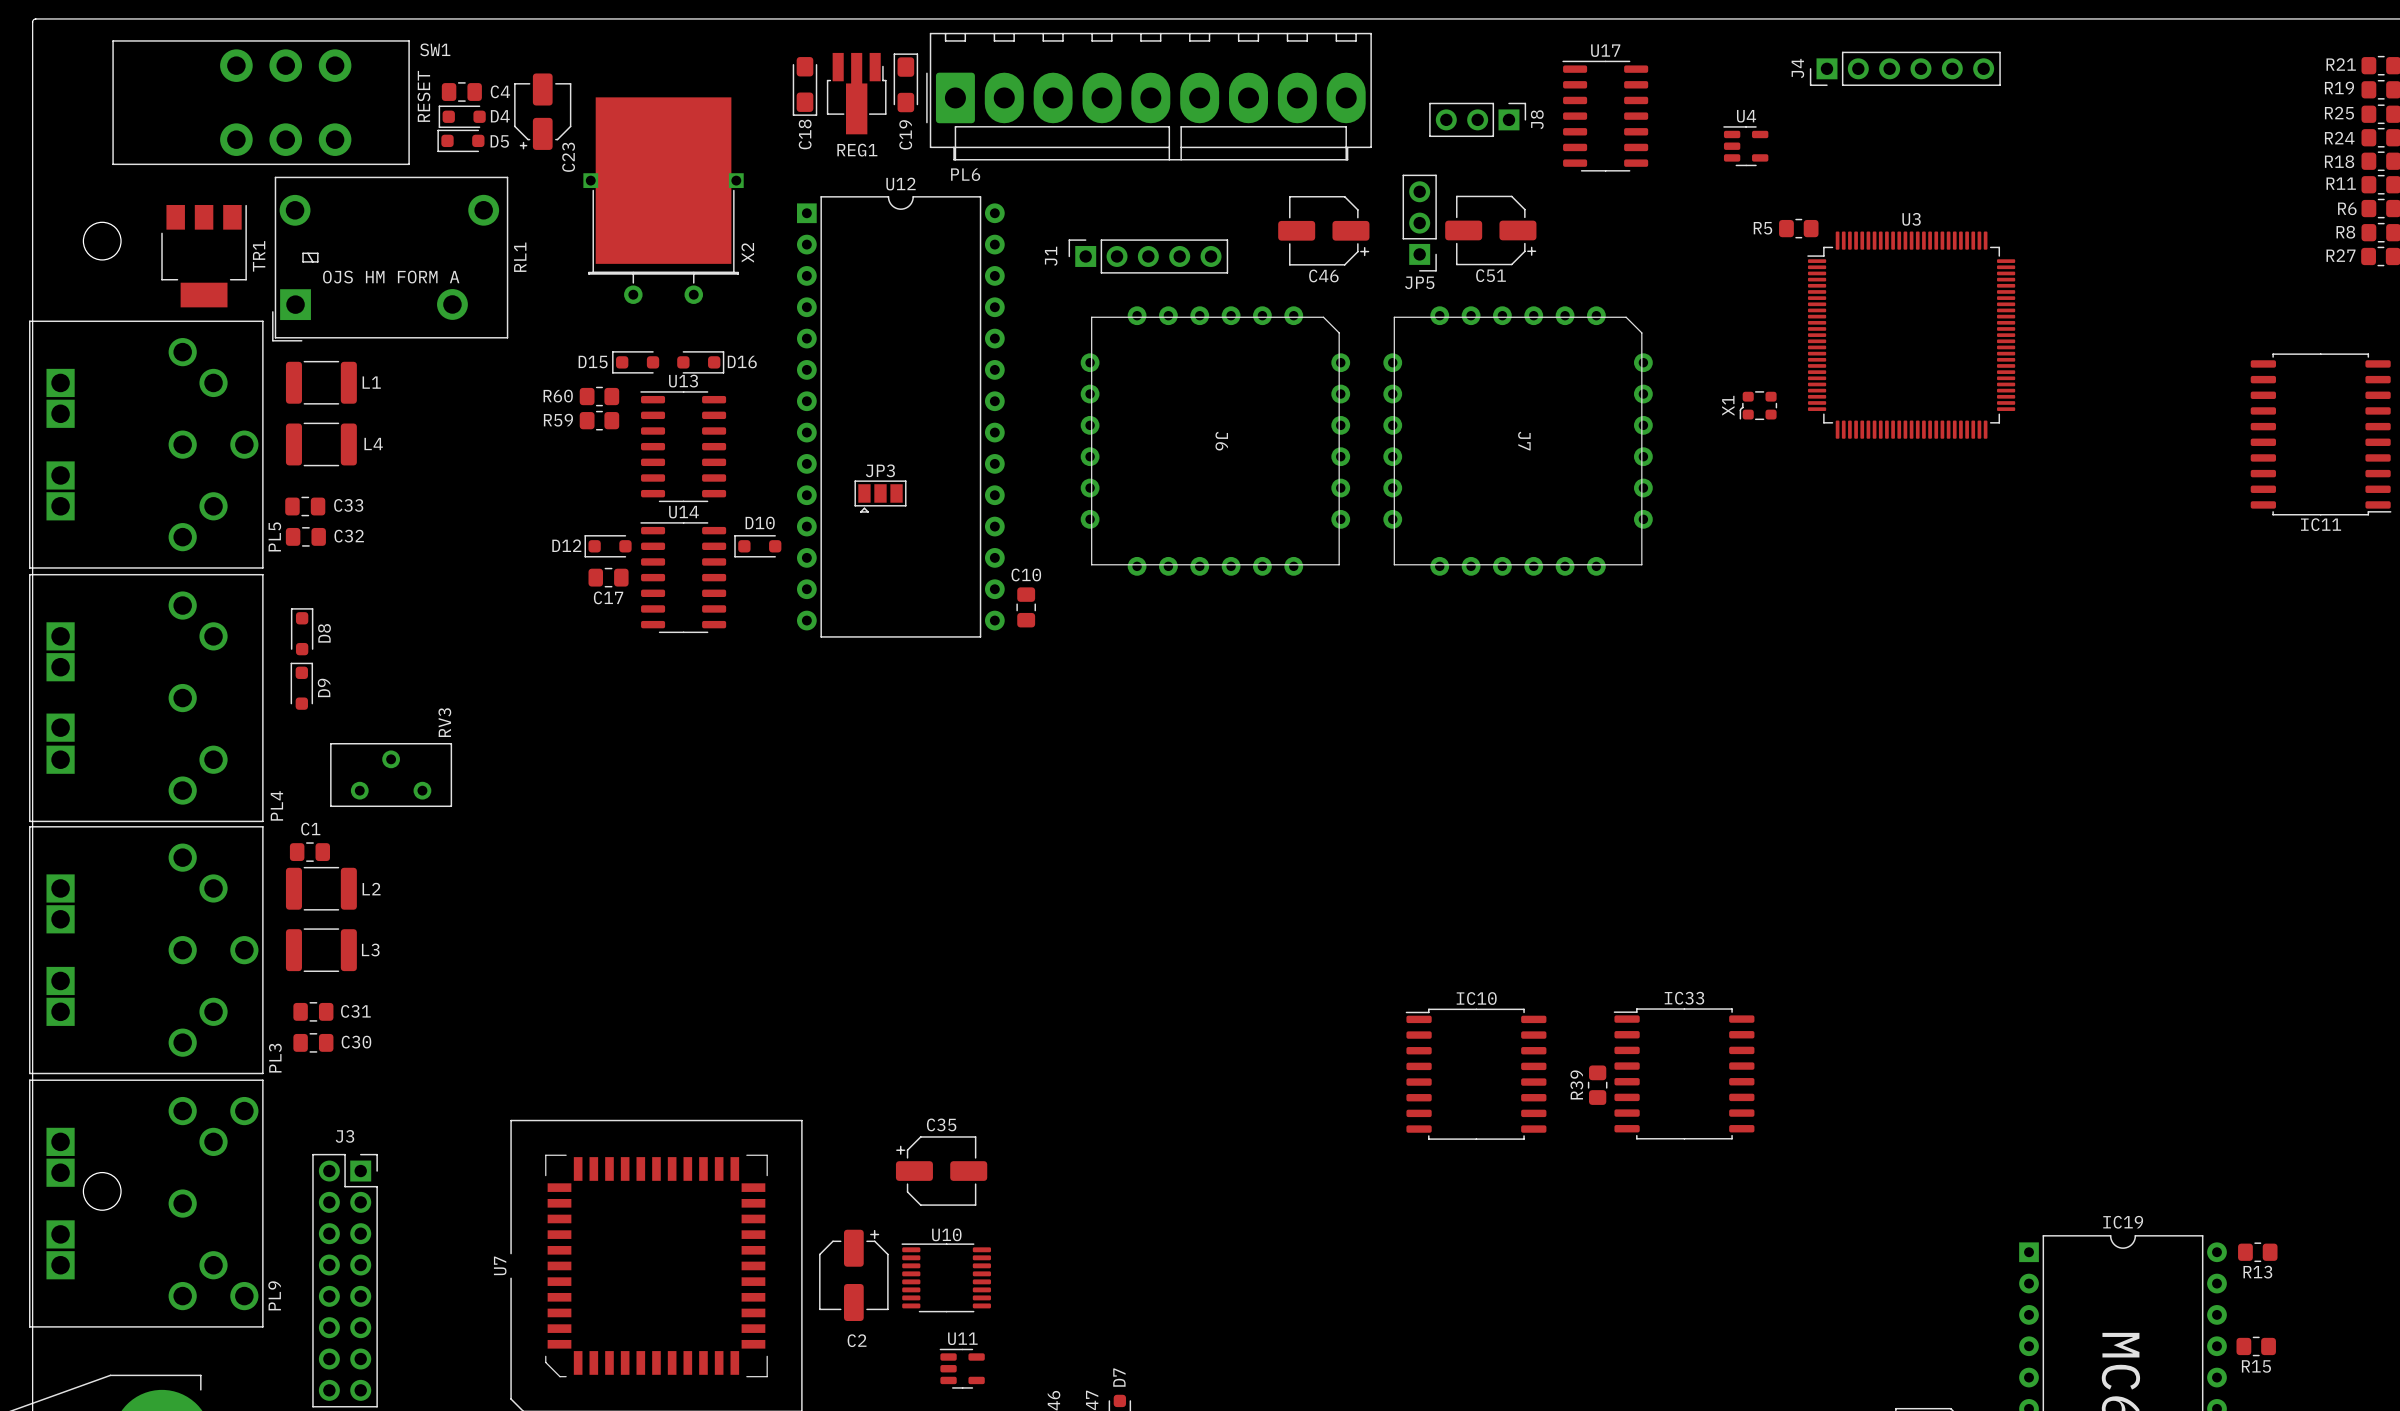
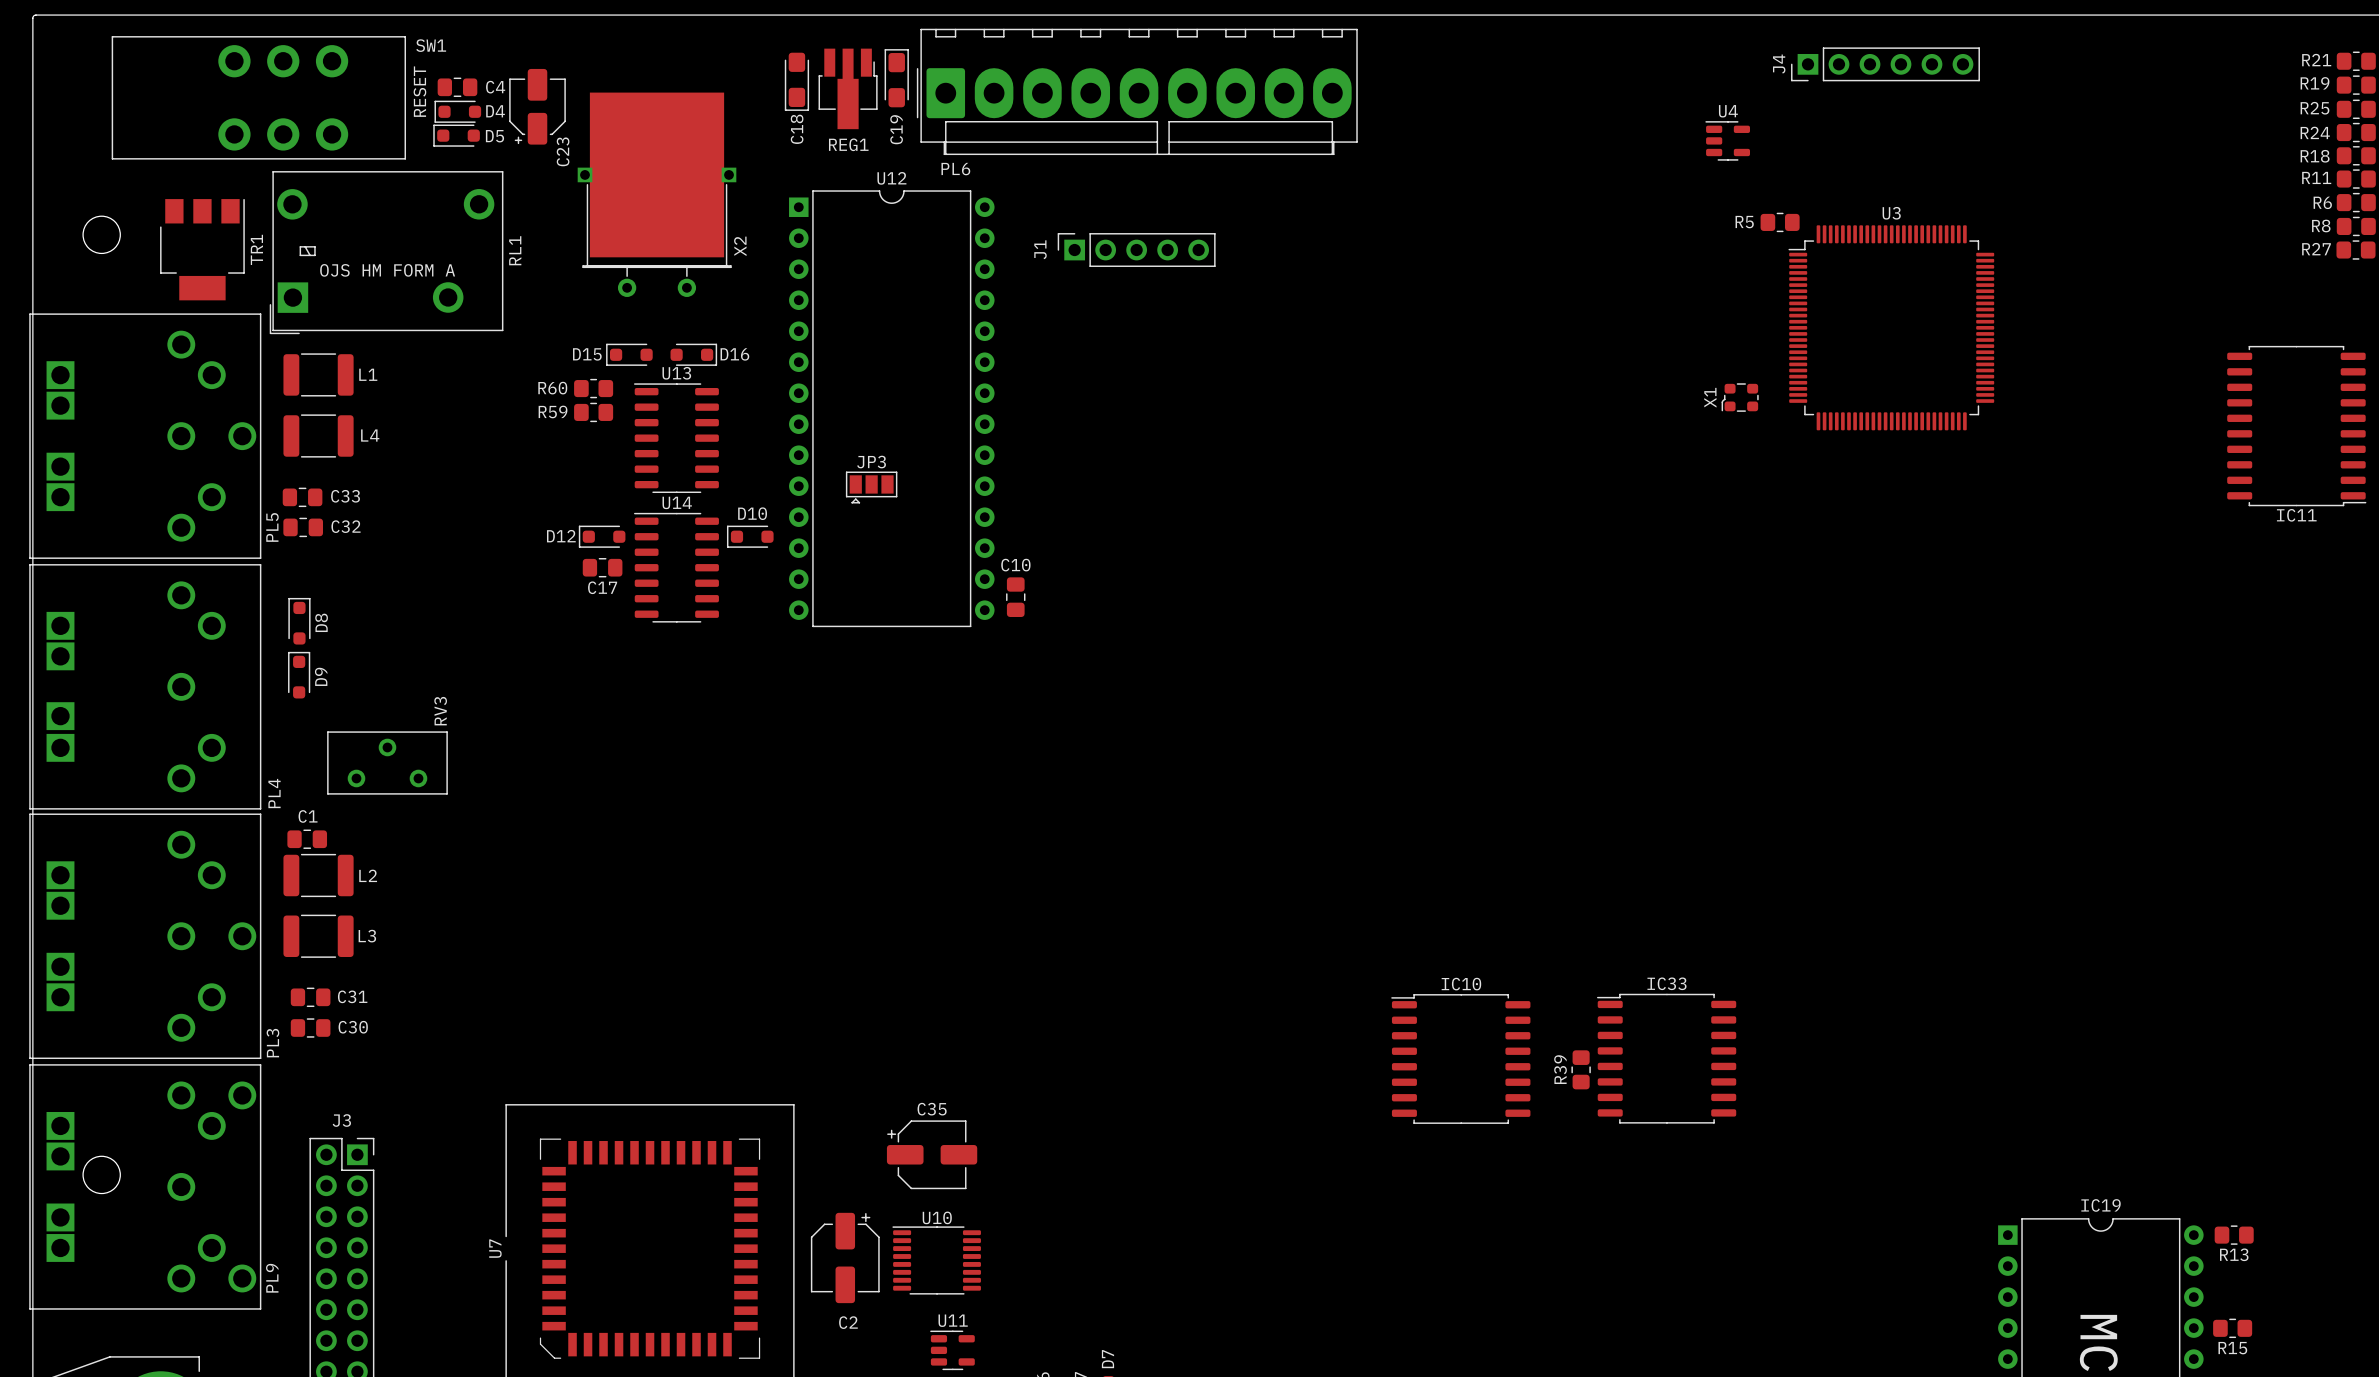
U17: (1605, 116) -> none
J8: (1477, 119) -> none
JP5: (1419, 223) -> none
C46: (1323, 230) -> none
C51: (1490, 230) -> none
J6: (1215, 441) -> none
J7: (1518, 441) -> none

